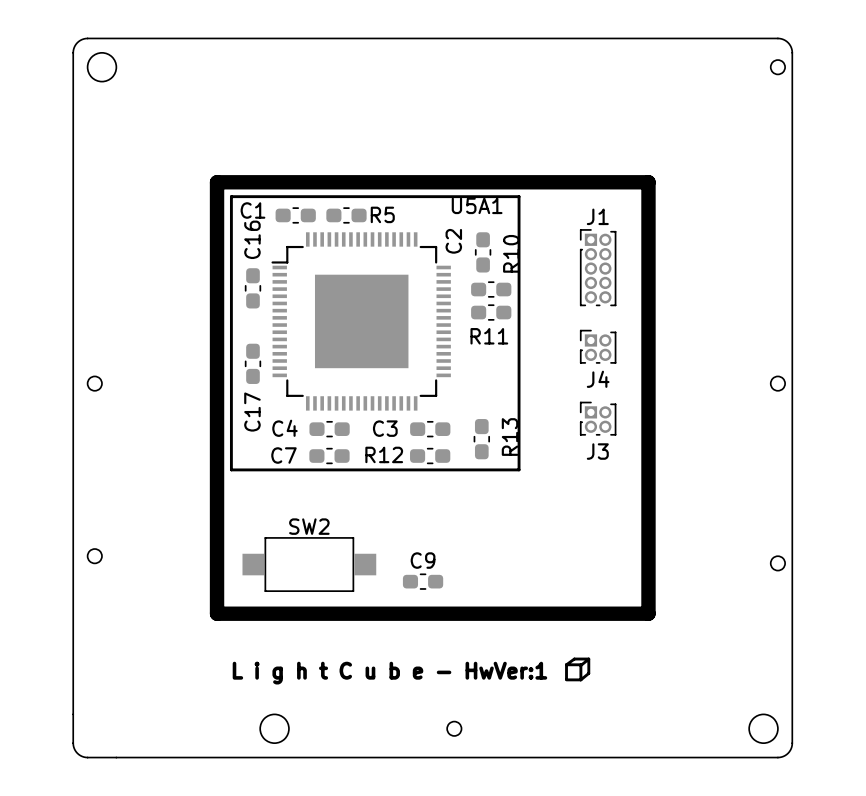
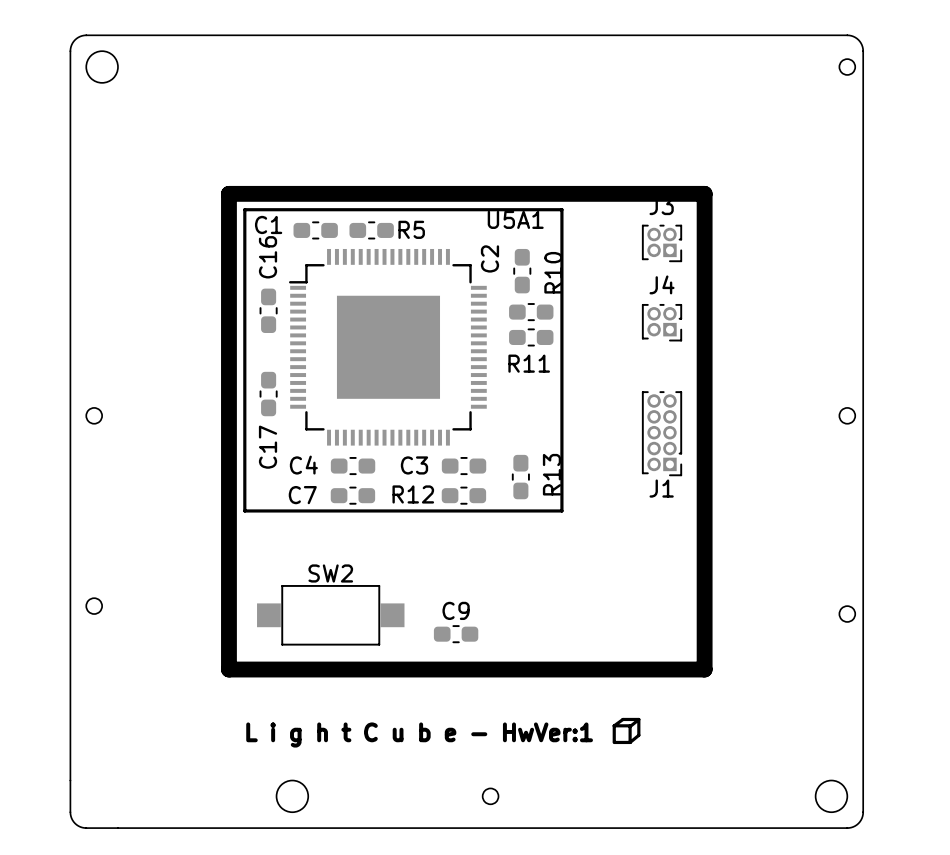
J1 rotation: 0° (598, 267) -> 180° (662, 433)
J1 position: (598, 267) -> (662, 433)
J4 rotation: 0° (598, 346) -> 180° (662, 322)
J4 position: (598, 346) -> (662, 322)
J3 rotation: 0° (598, 418) -> 180° (662, 243)
J3 position: (598, 418) -> (662, 243)

